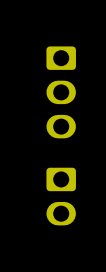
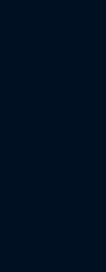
part: (61, 92) -> none
part: (61, 196) -> none

